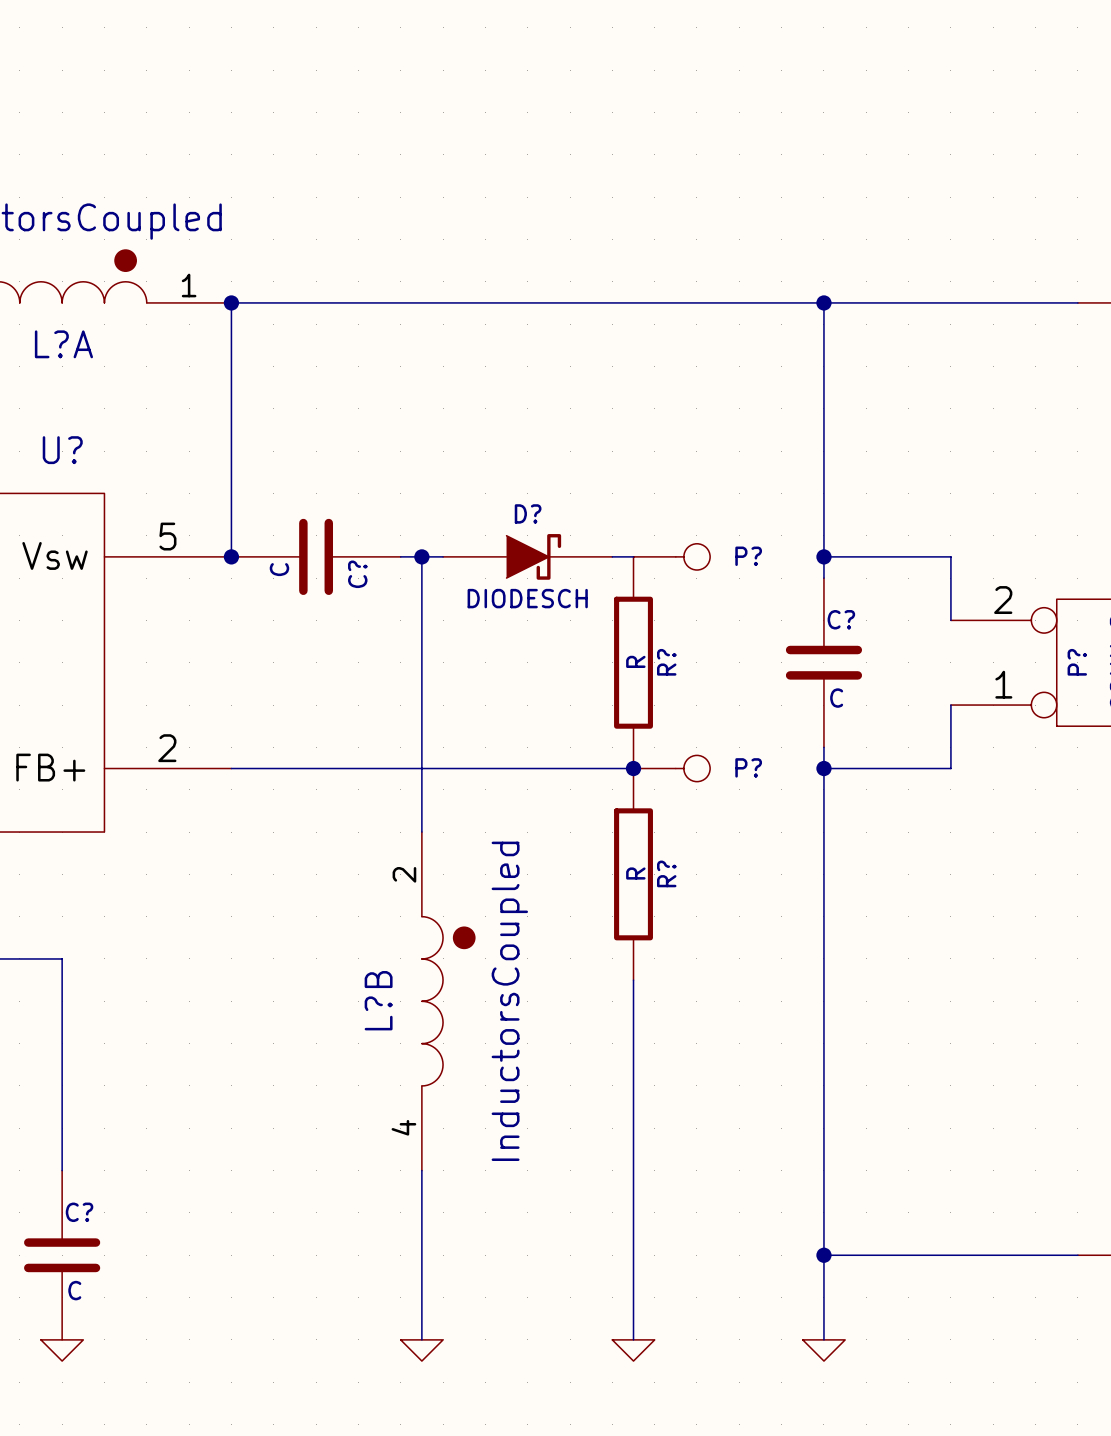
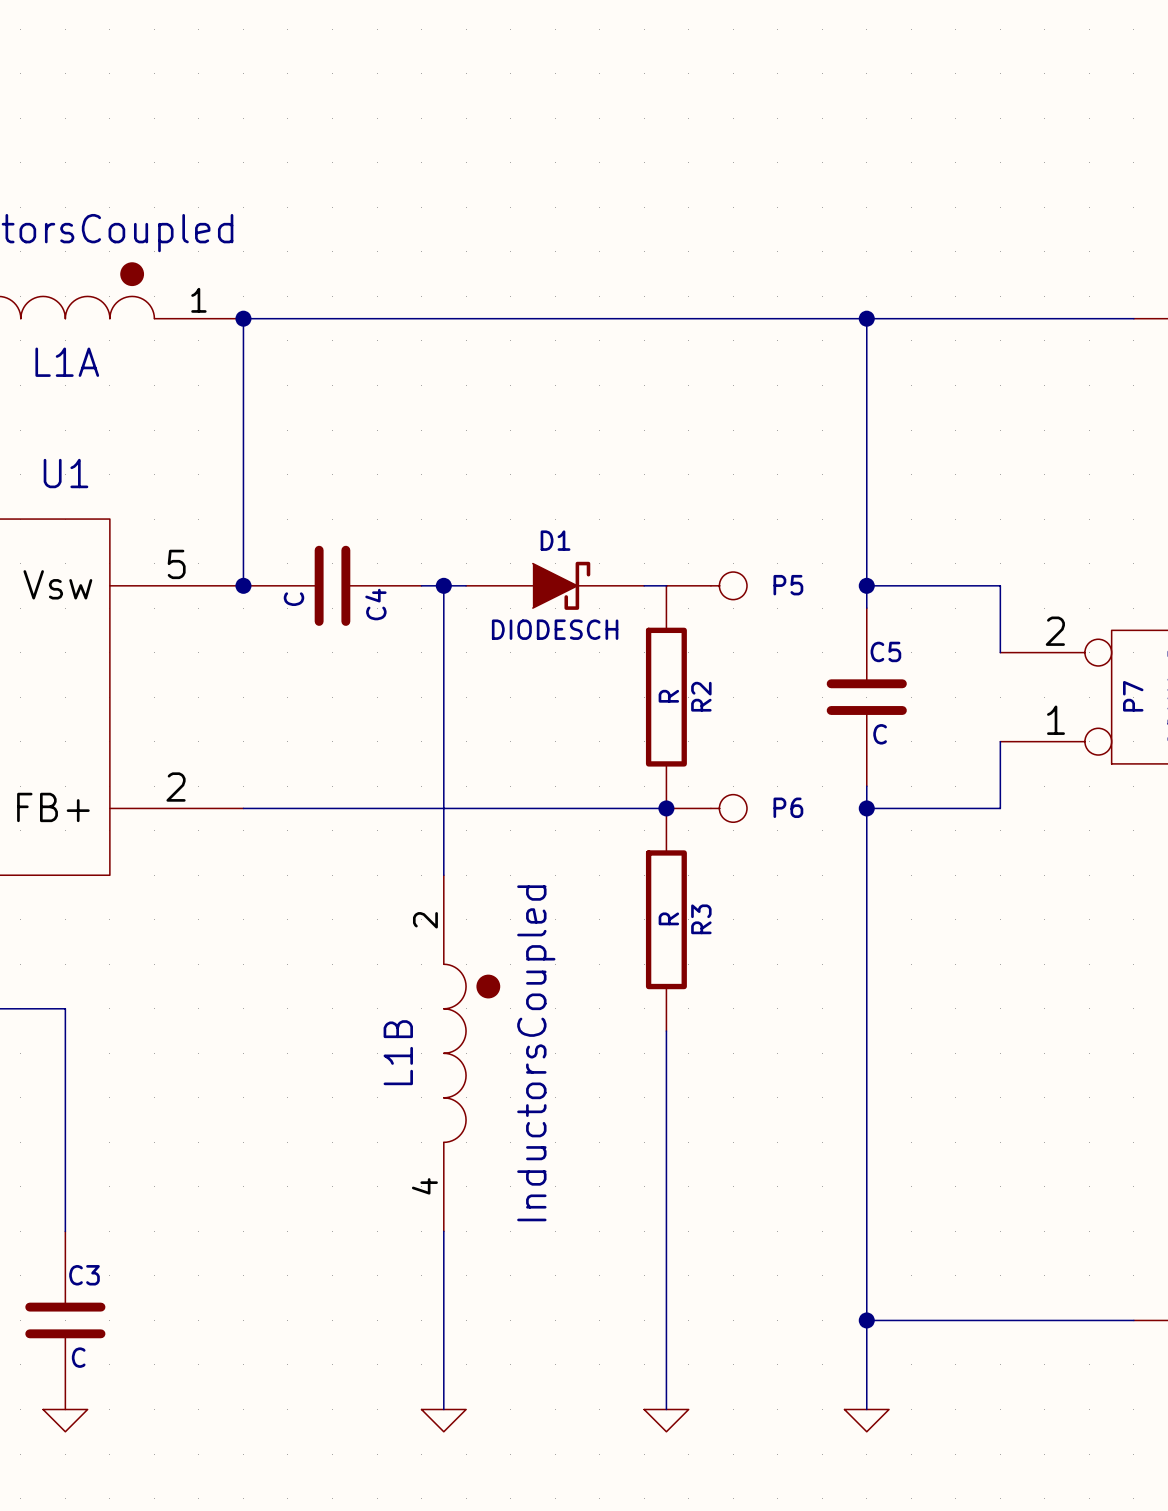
L?A name: L?A (63, 344) -> L1A (67, 362)
U? name: U? (62, 450) -> U1 (65, 473)
D? name: D? (528, 513) -> D1 (555, 540)
P? name: P? (748, 556) -> P5 (788, 585)
C? name: C? (357, 574) -> C4 (375, 604)
C? name: C? (841, 619) -> C5 (885, 651)
R? name: R? (666, 662) -> R2 (701, 696)
P? name: P? (1077, 662) -> P7 (1133, 696)
P? name: P? (748, 767) -> P6 (788, 807)
R? name: R? (666, 873) -> R3 (701, 919)
L?B name: L?B (378, 1000) -> L1B (398, 1052)
C? name: C? (79, 1212) -> C3 (84, 1275)

